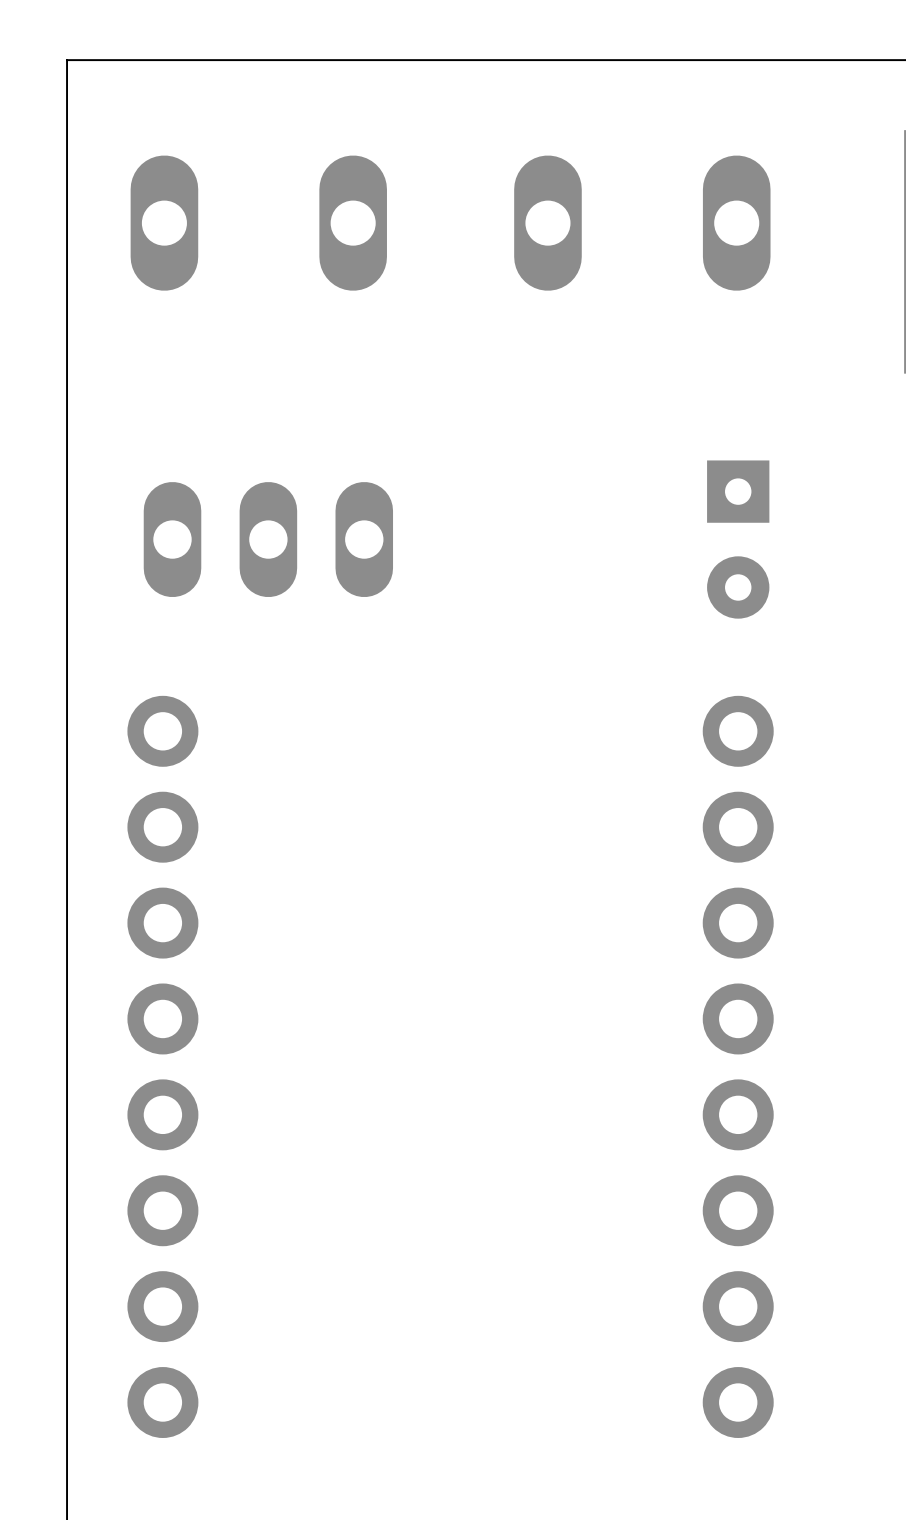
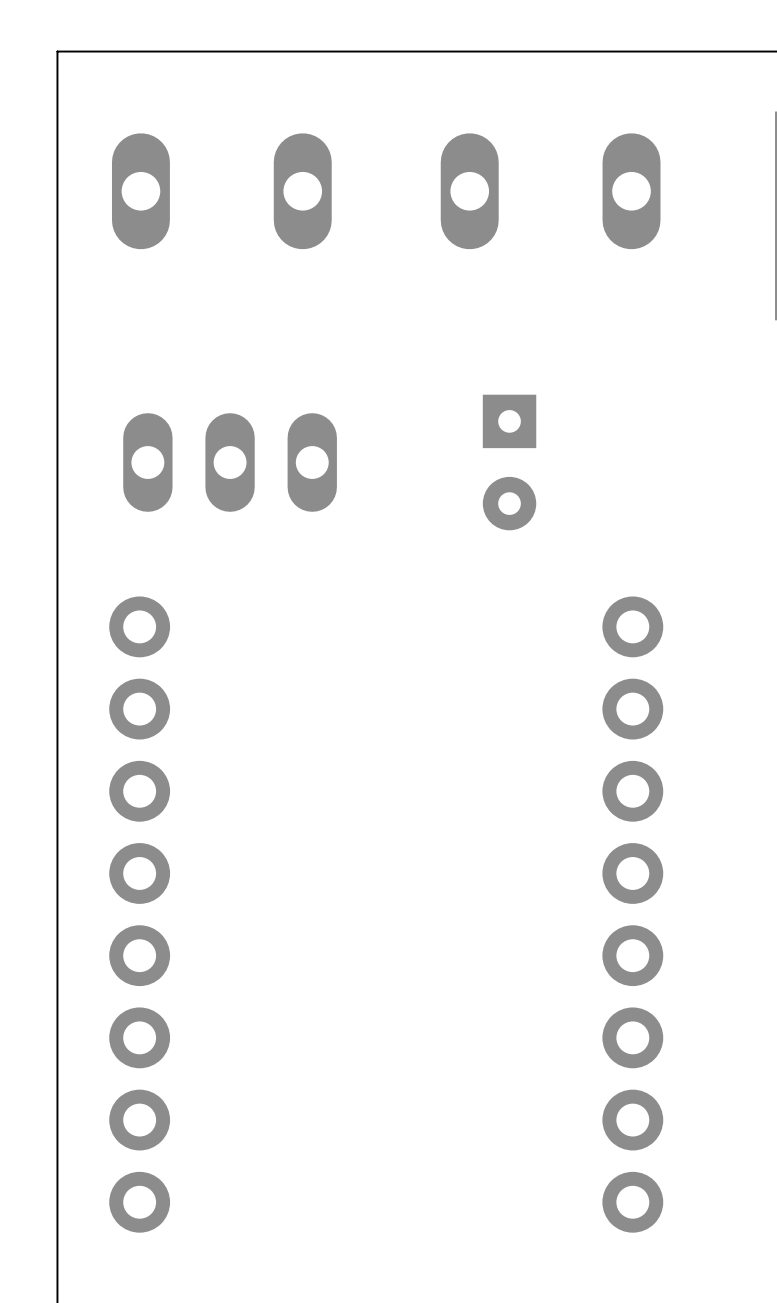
part position: (738, 539) -> (509, 462)

